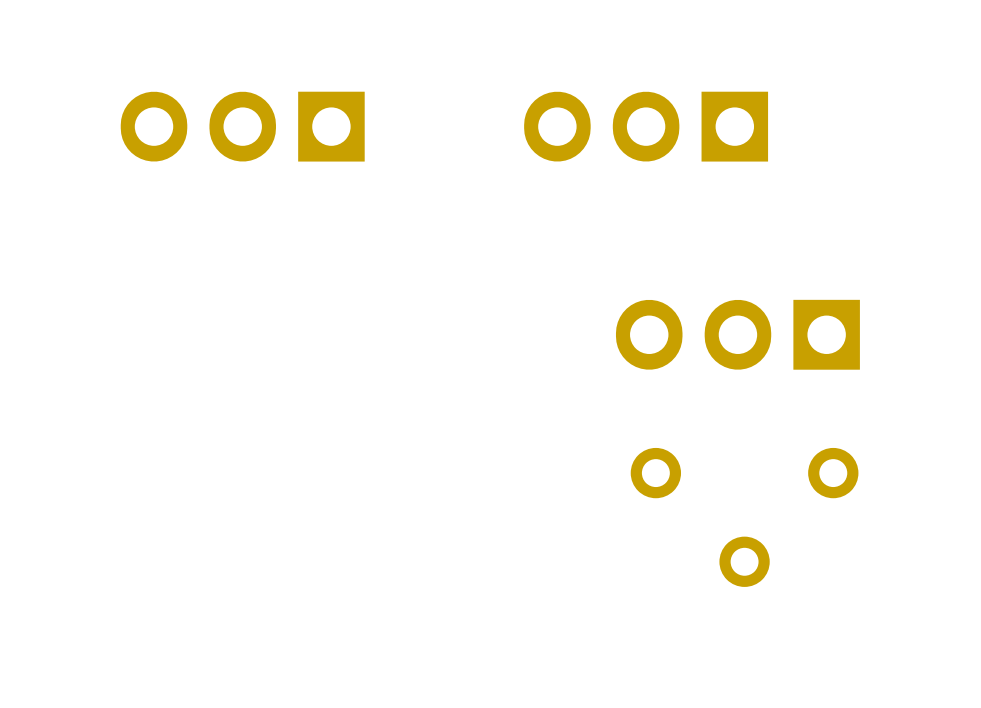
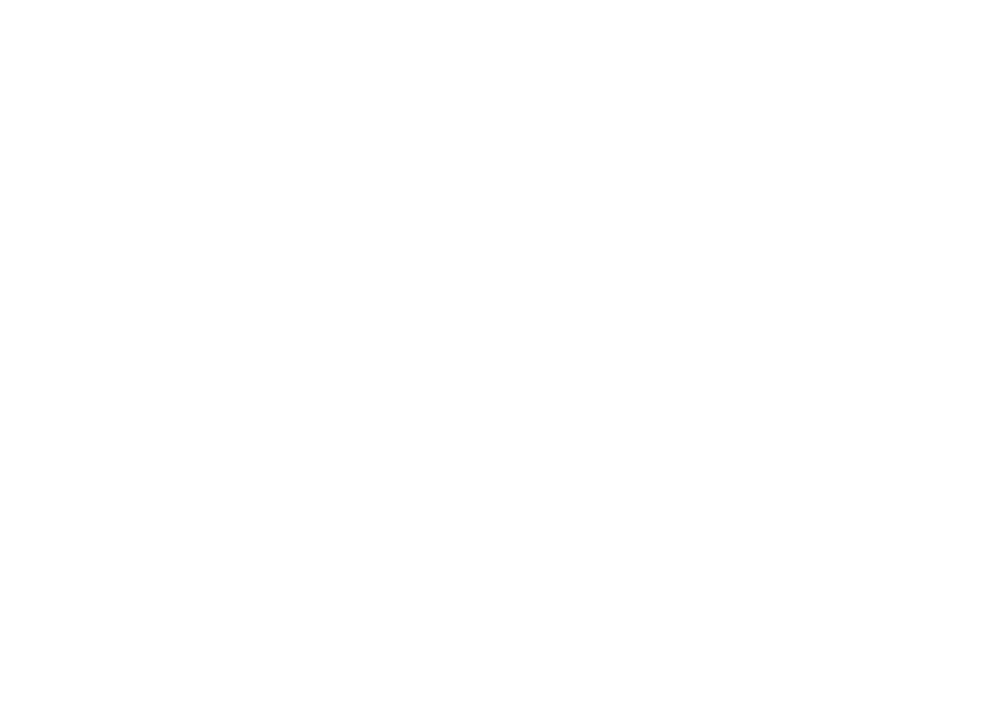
part: (242, 126) -> none
part: (646, 126) -> none
part: (737, 334) -> none
part: (744, 517) -> none

